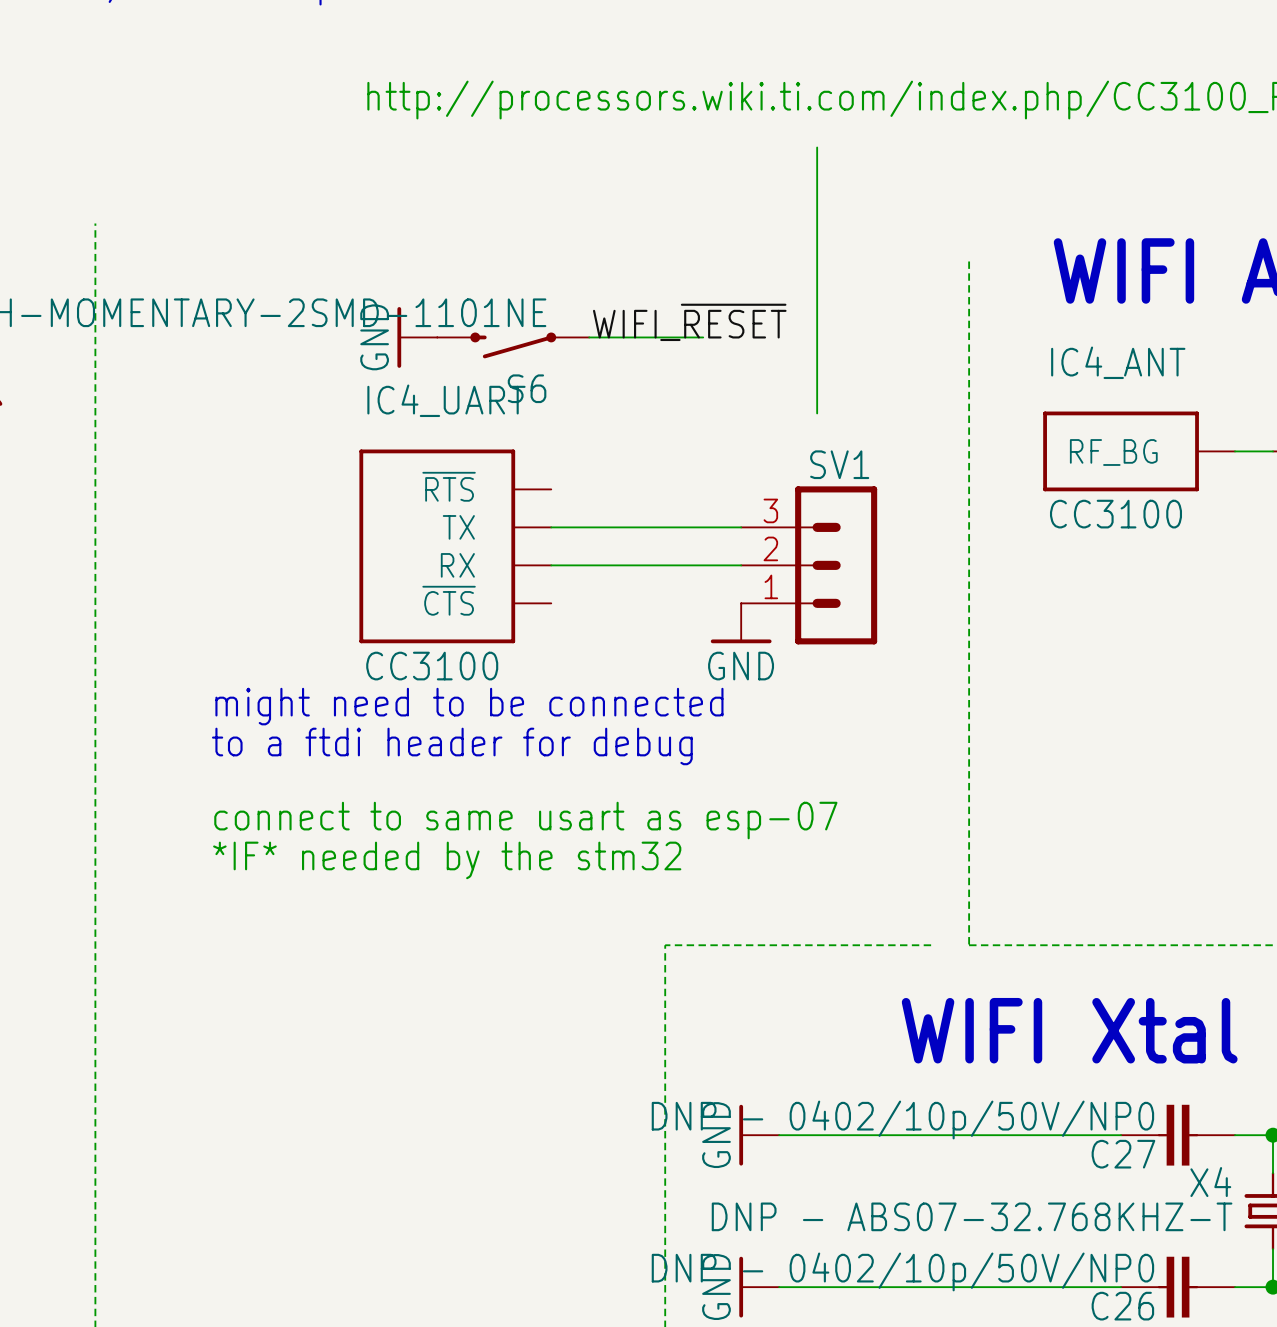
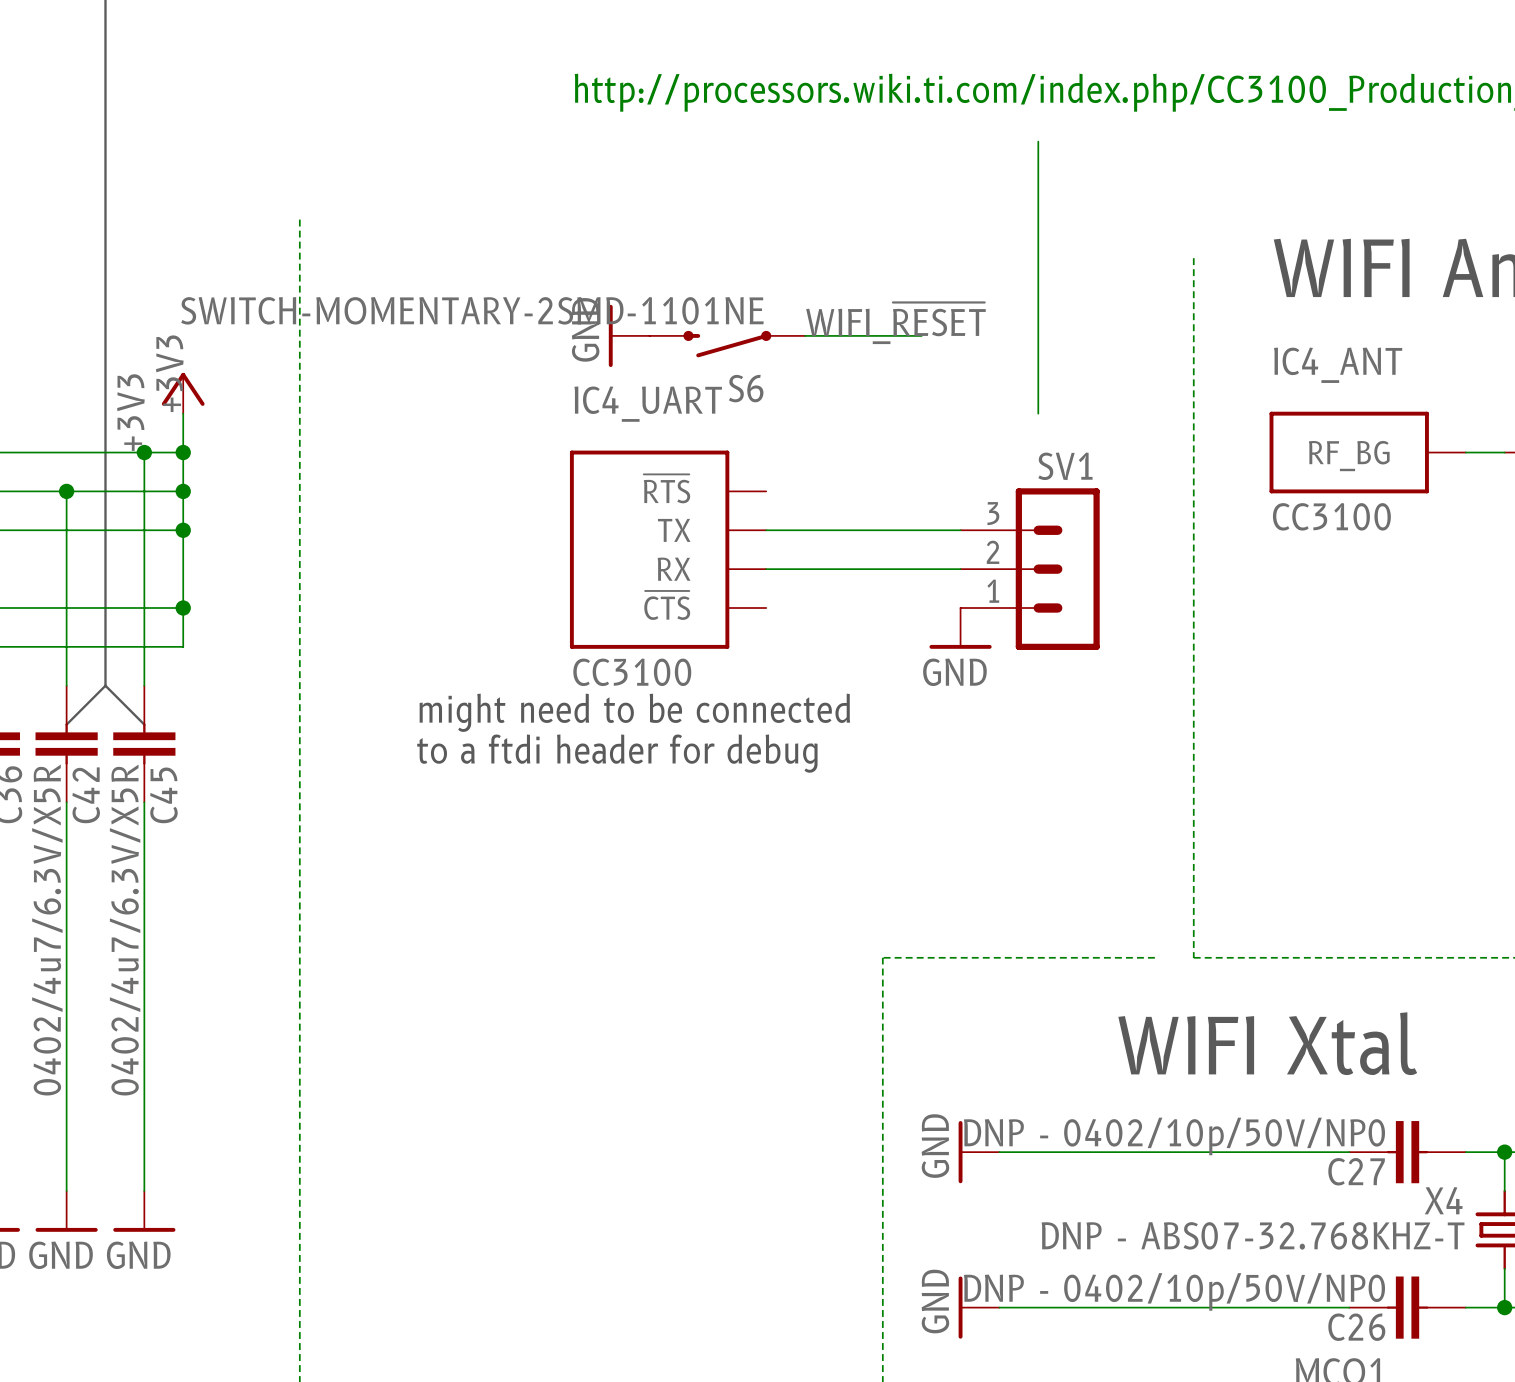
text: connect to same usart as esp-07 (525, 820) -> none
text: *IF* needed by the stm32 (447, 860) -> none

